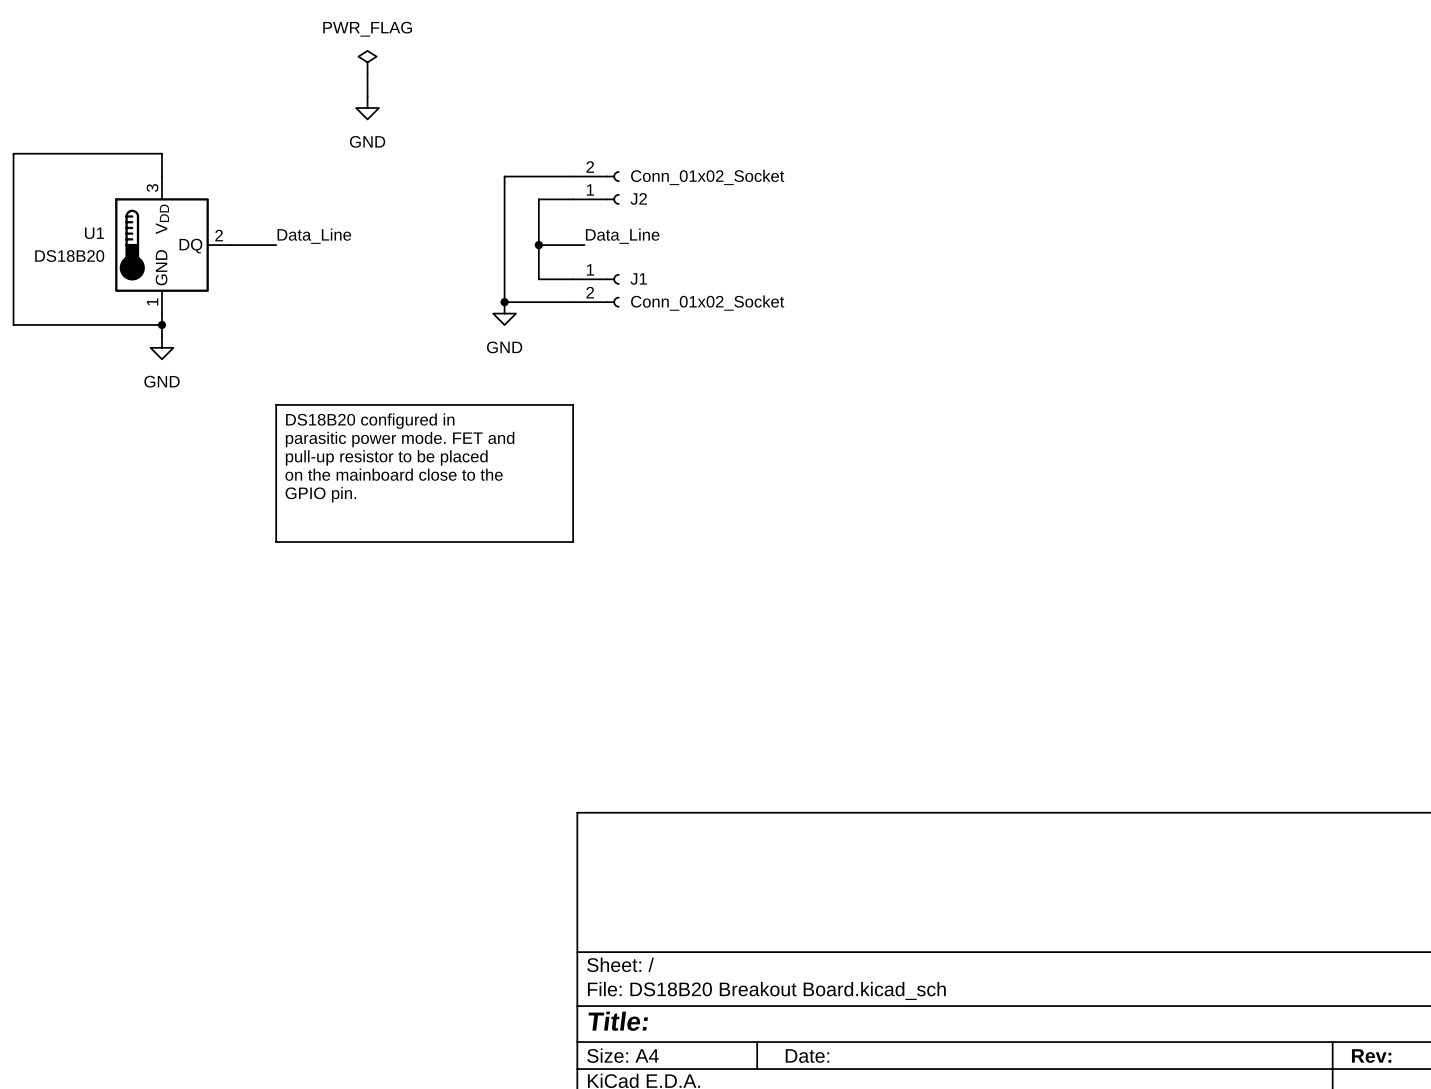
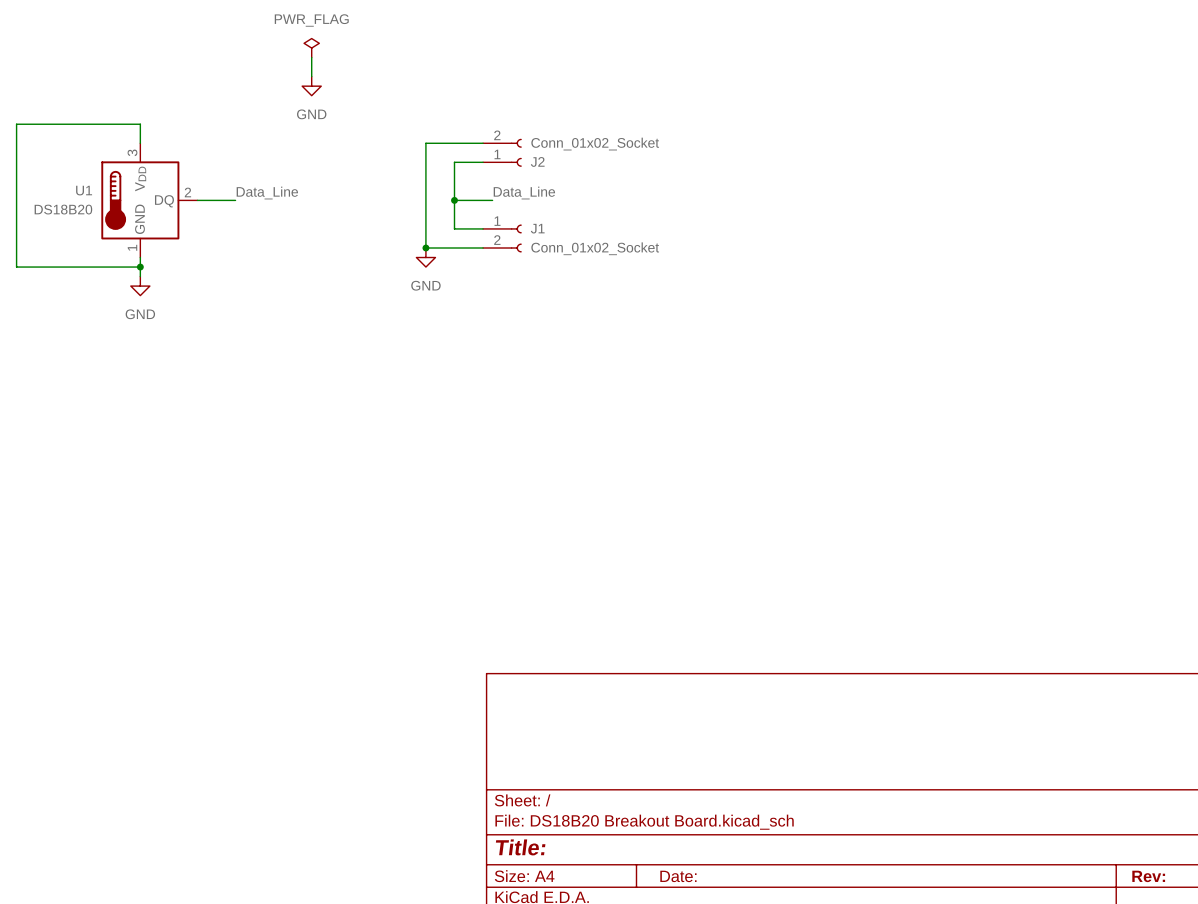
line: (276, 404) (573, 404) (573, 541) (276, 541) (276, 404) -> none
text: DS18B20 configured in (370, 421) -> none
text: parasitic power mode. FET and (400, 439) -> none
text: pull-up resistor to be placed (386, 457) -> none
text: on the mainboard close to the (394, 474) -> none
text: GPIO pin. (320, 494) -> none

